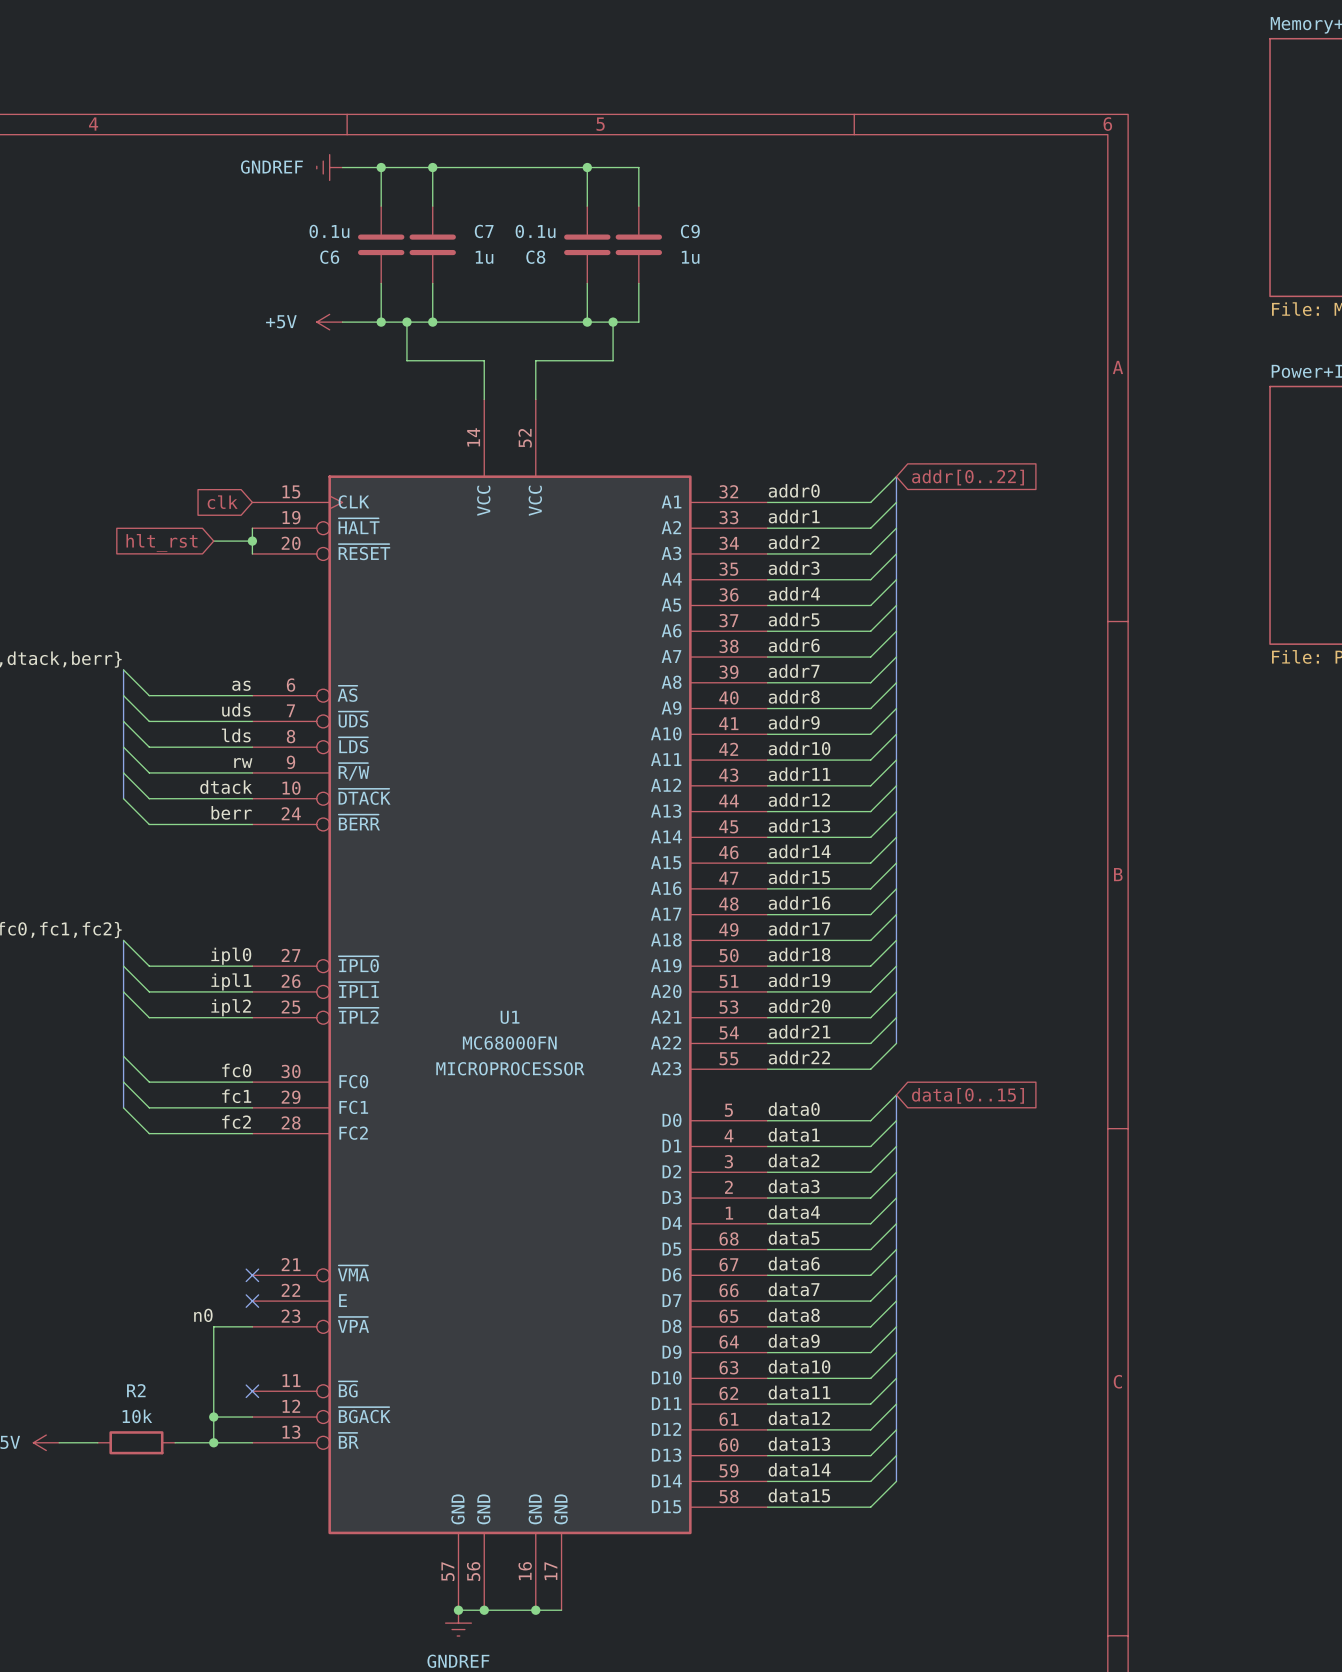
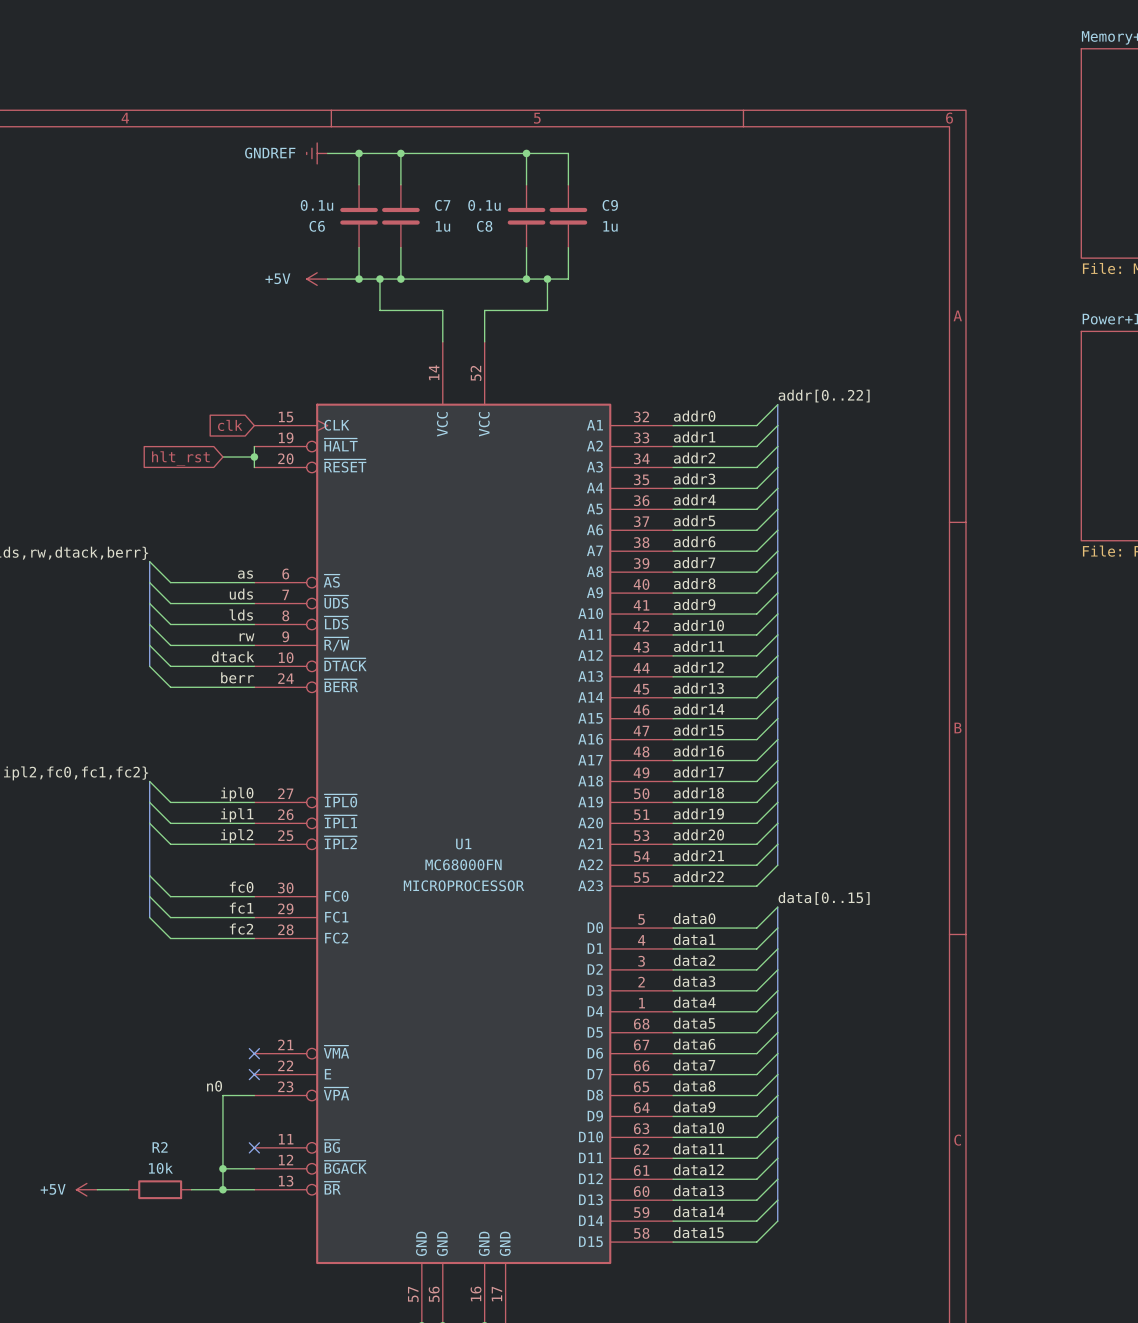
label: none -> addr[0..22] (824, 396)
global label: addr[0..22] (968, 477) -> none
label: none -> data[0..15] (824, 898)
global label: data[0..15] (967, 1095) -> none

